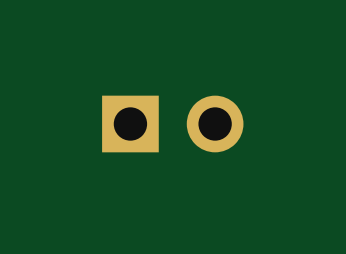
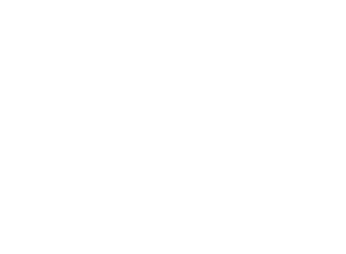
part: (172, 123) -> none

